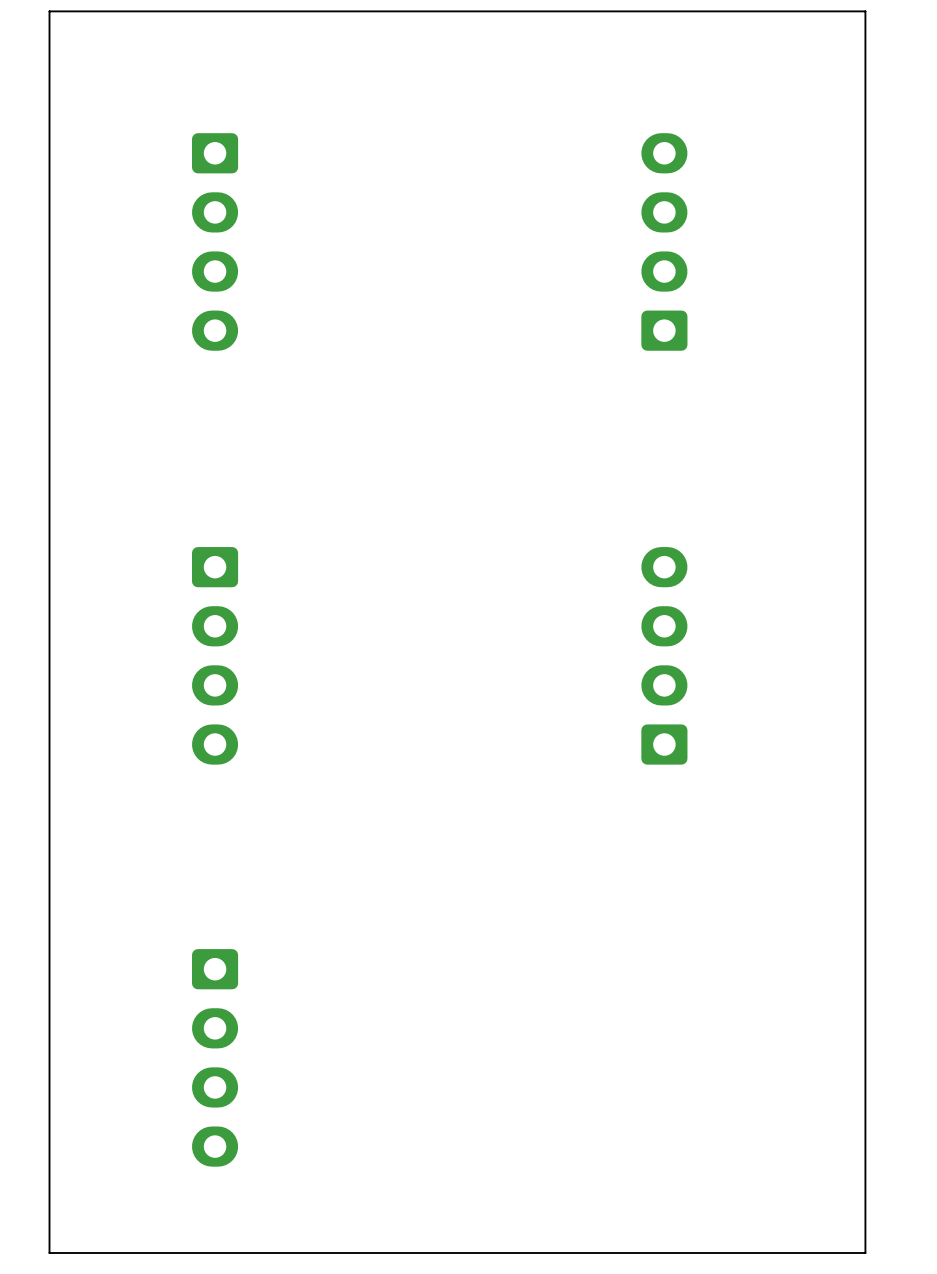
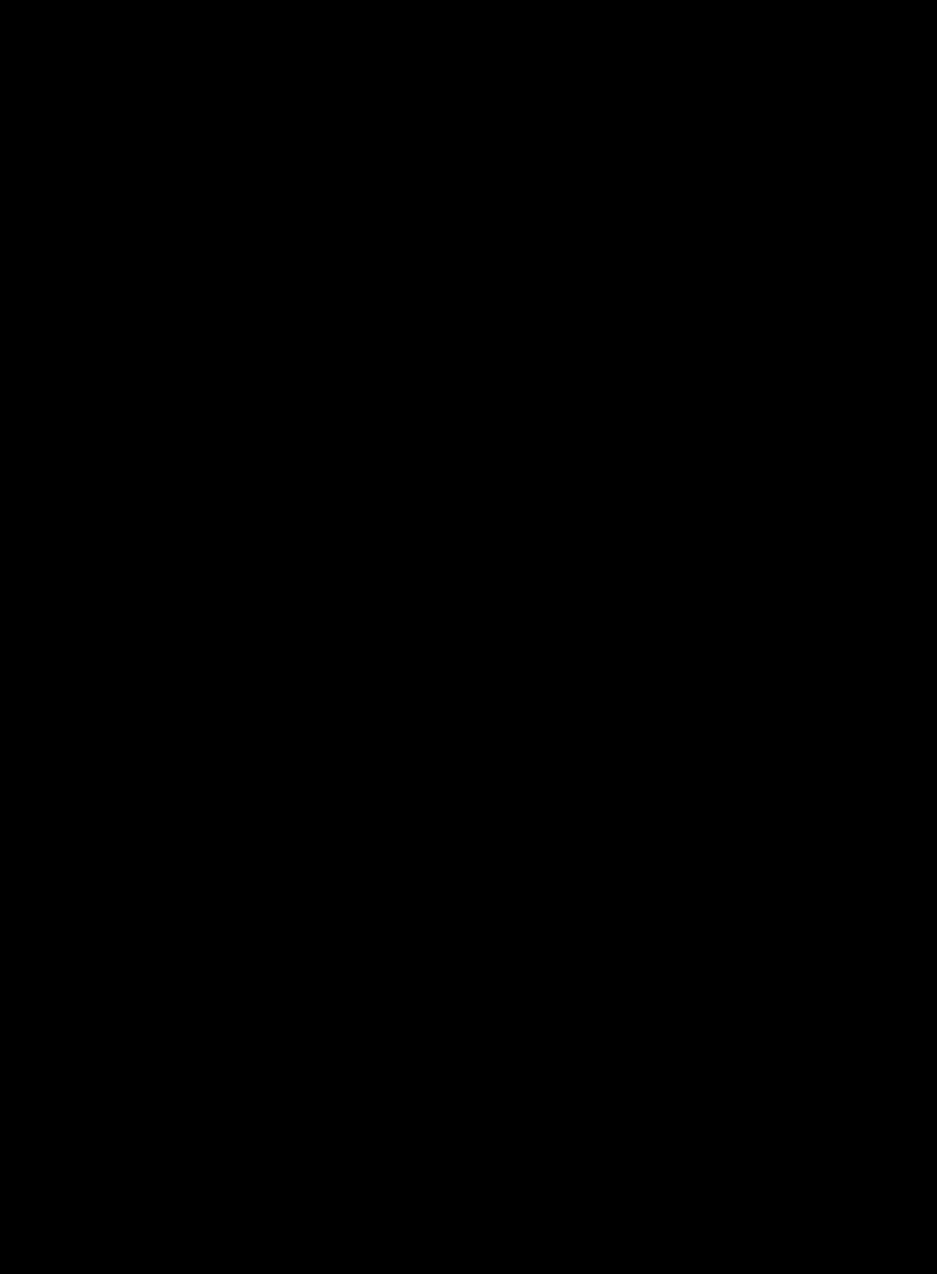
board edge: (865, 11) (49, 11) (49, 1253) (865, 1253) (865, 11) -> none
part: (215, 241) -> none
part: (664, 241) -> none
part: (215, 655) -> none
part: (664, 655) -> none
part: (215, 1057) -> none

